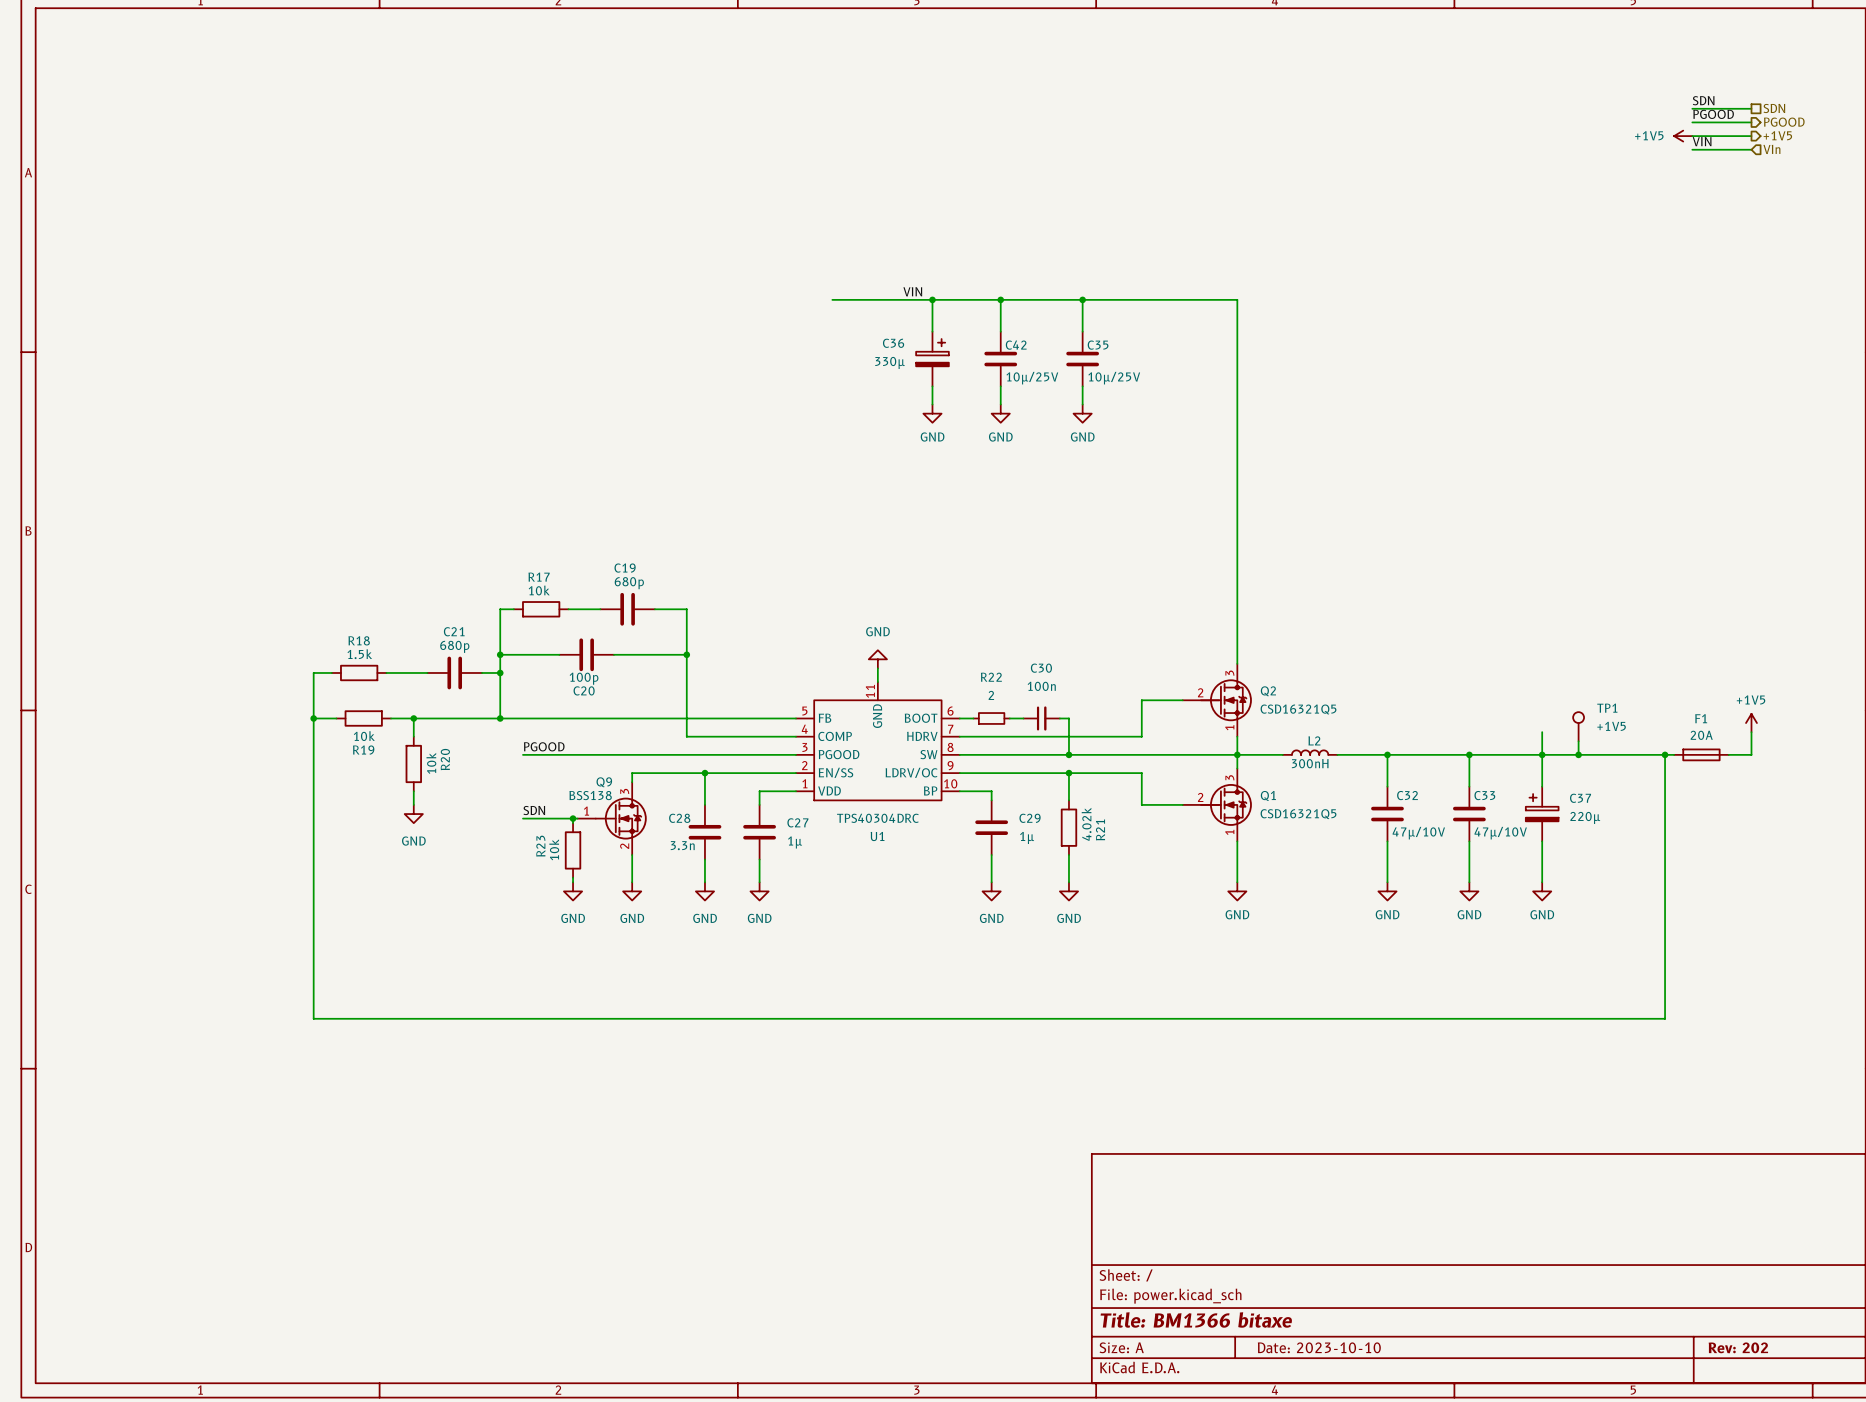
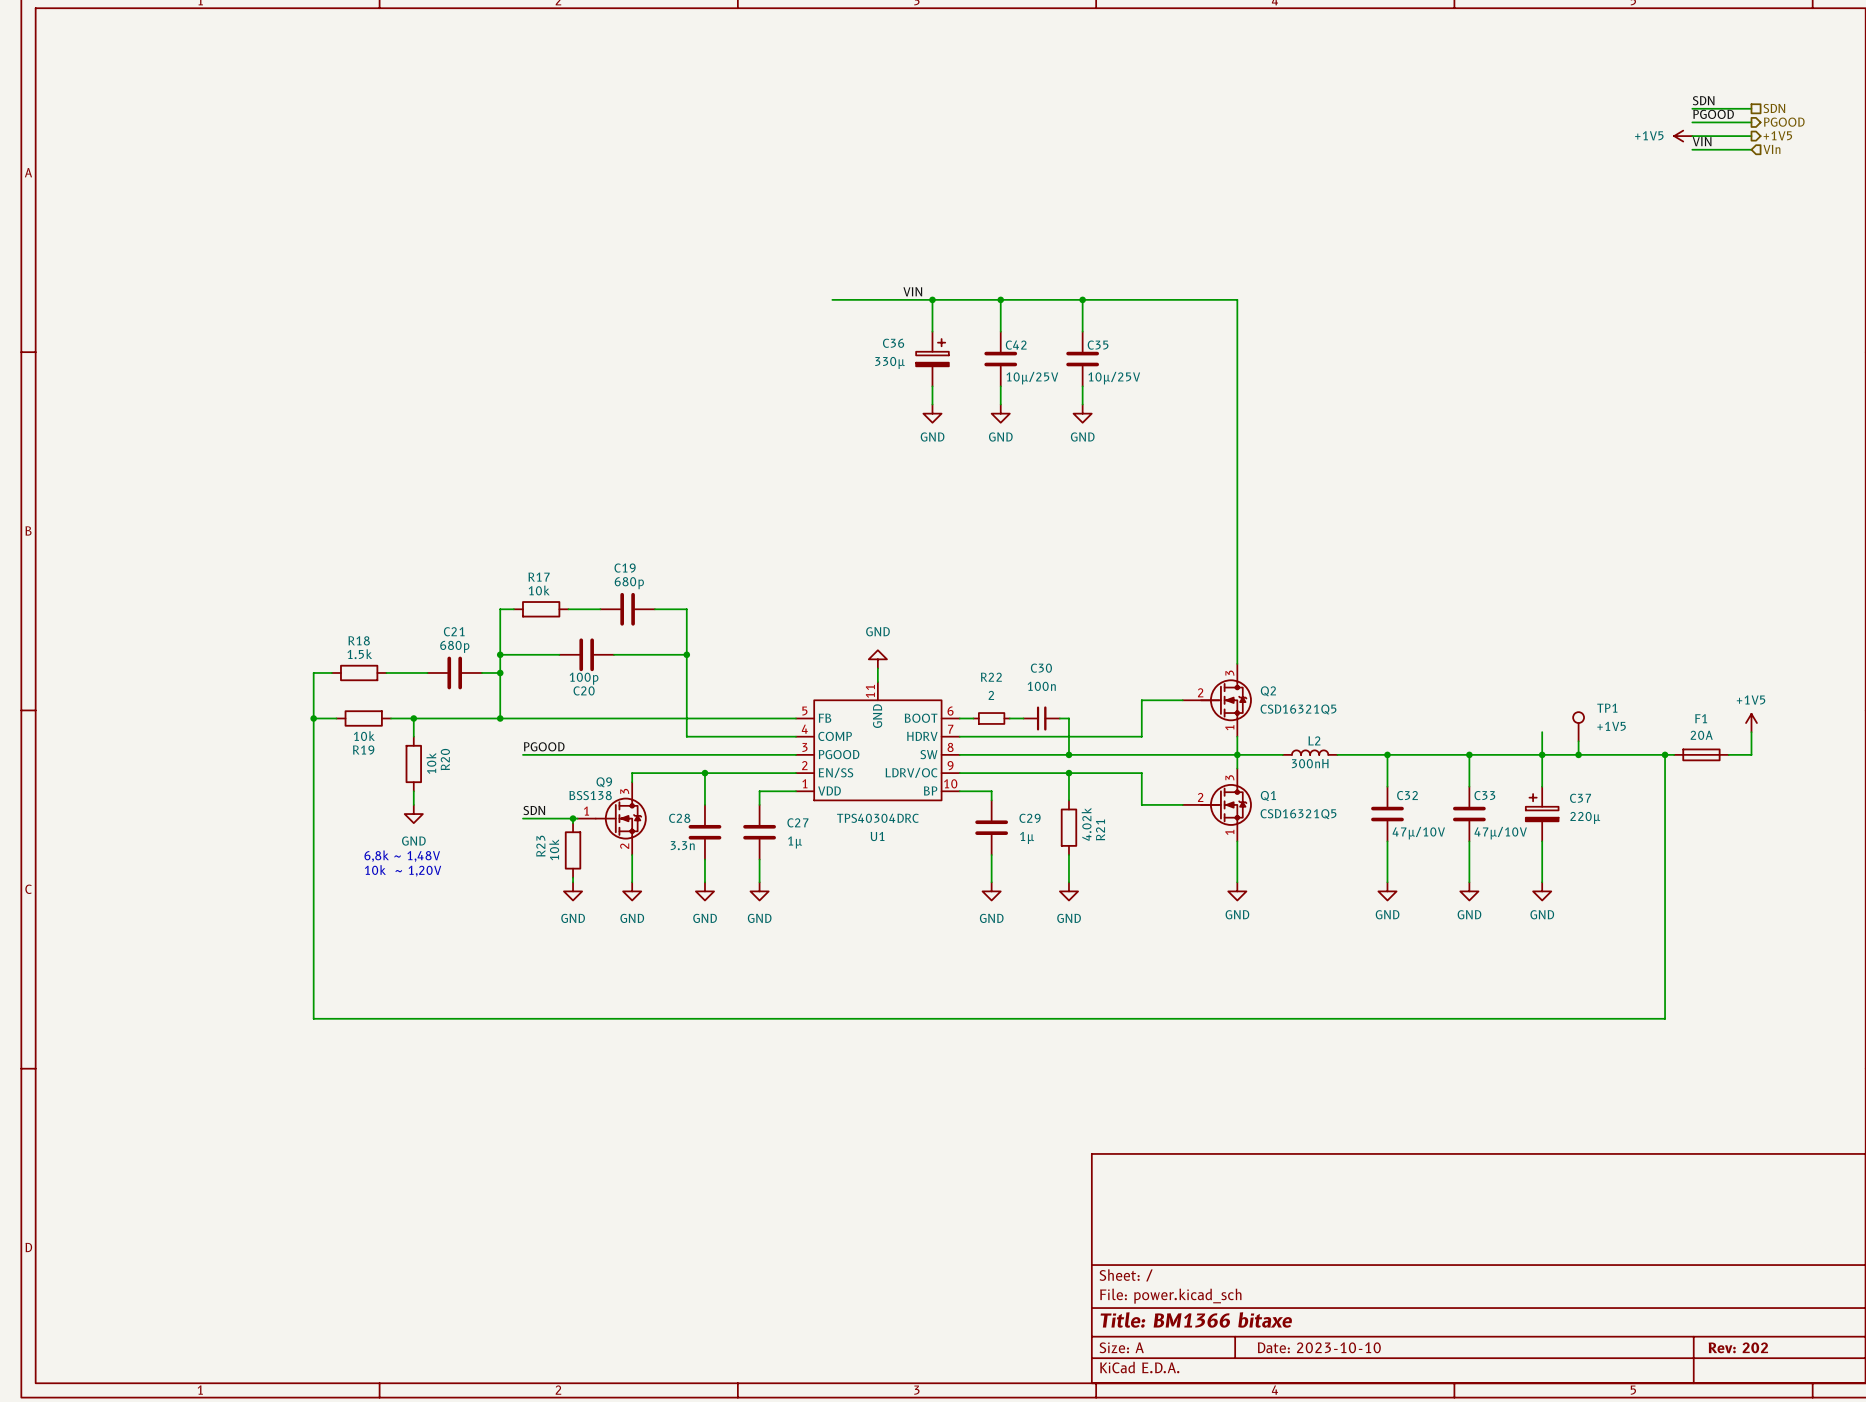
text: none -> 6,8k ~ 1,48V (402, 856)
text: none -> 10k ~ 1,20V (403, 870)

